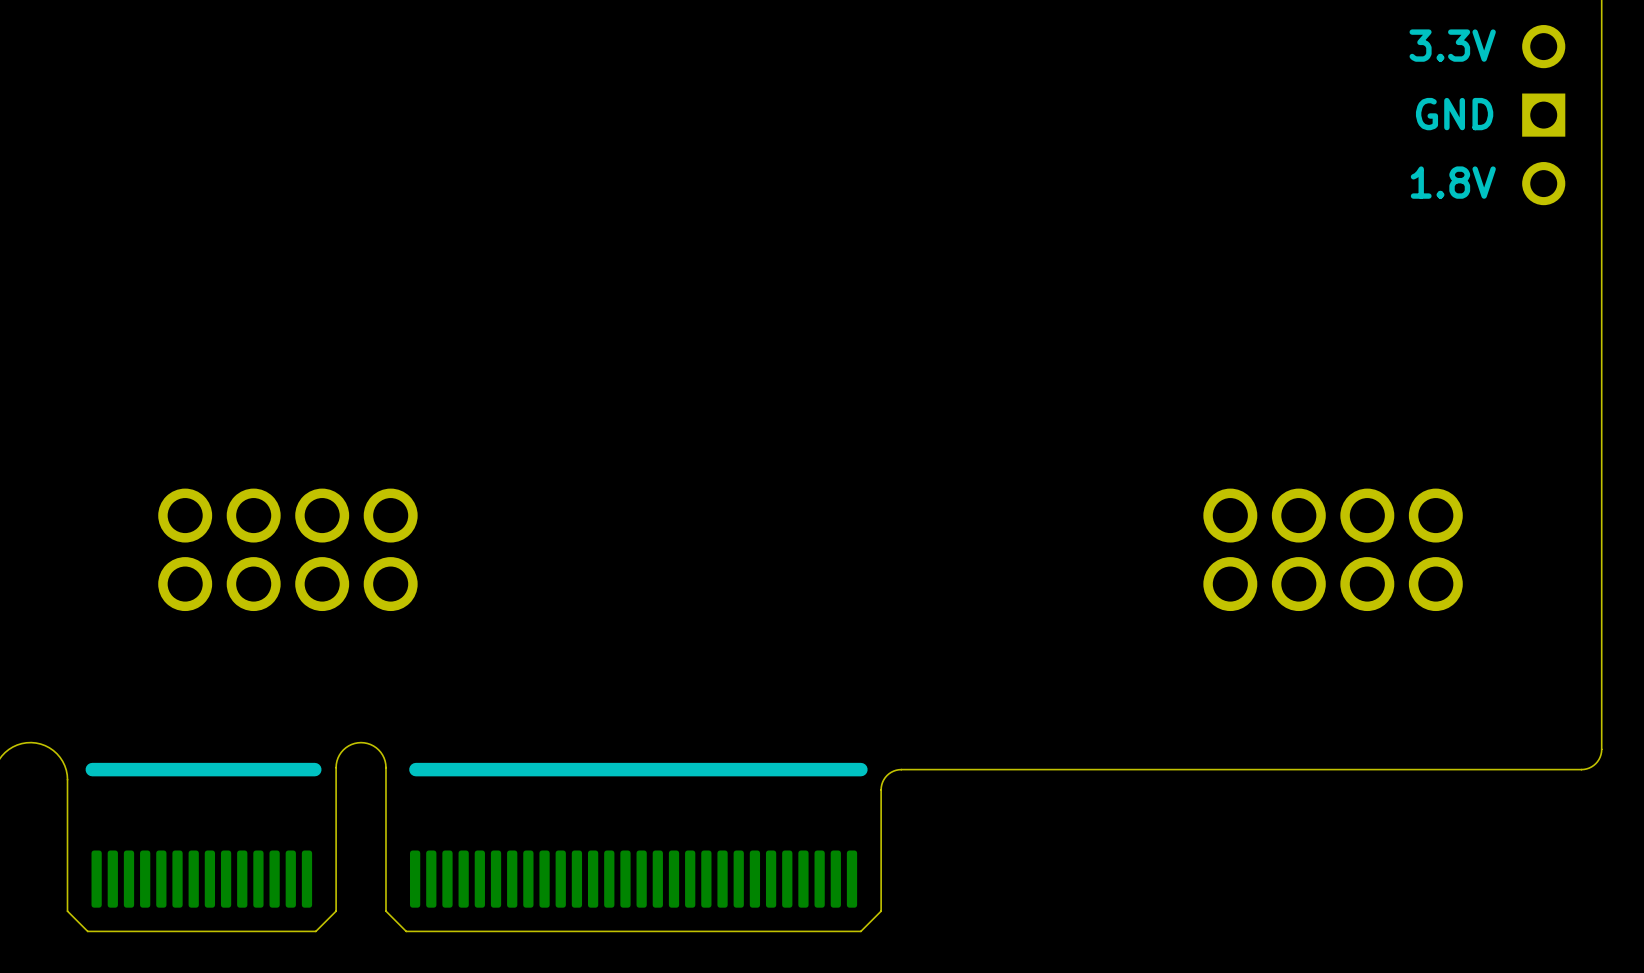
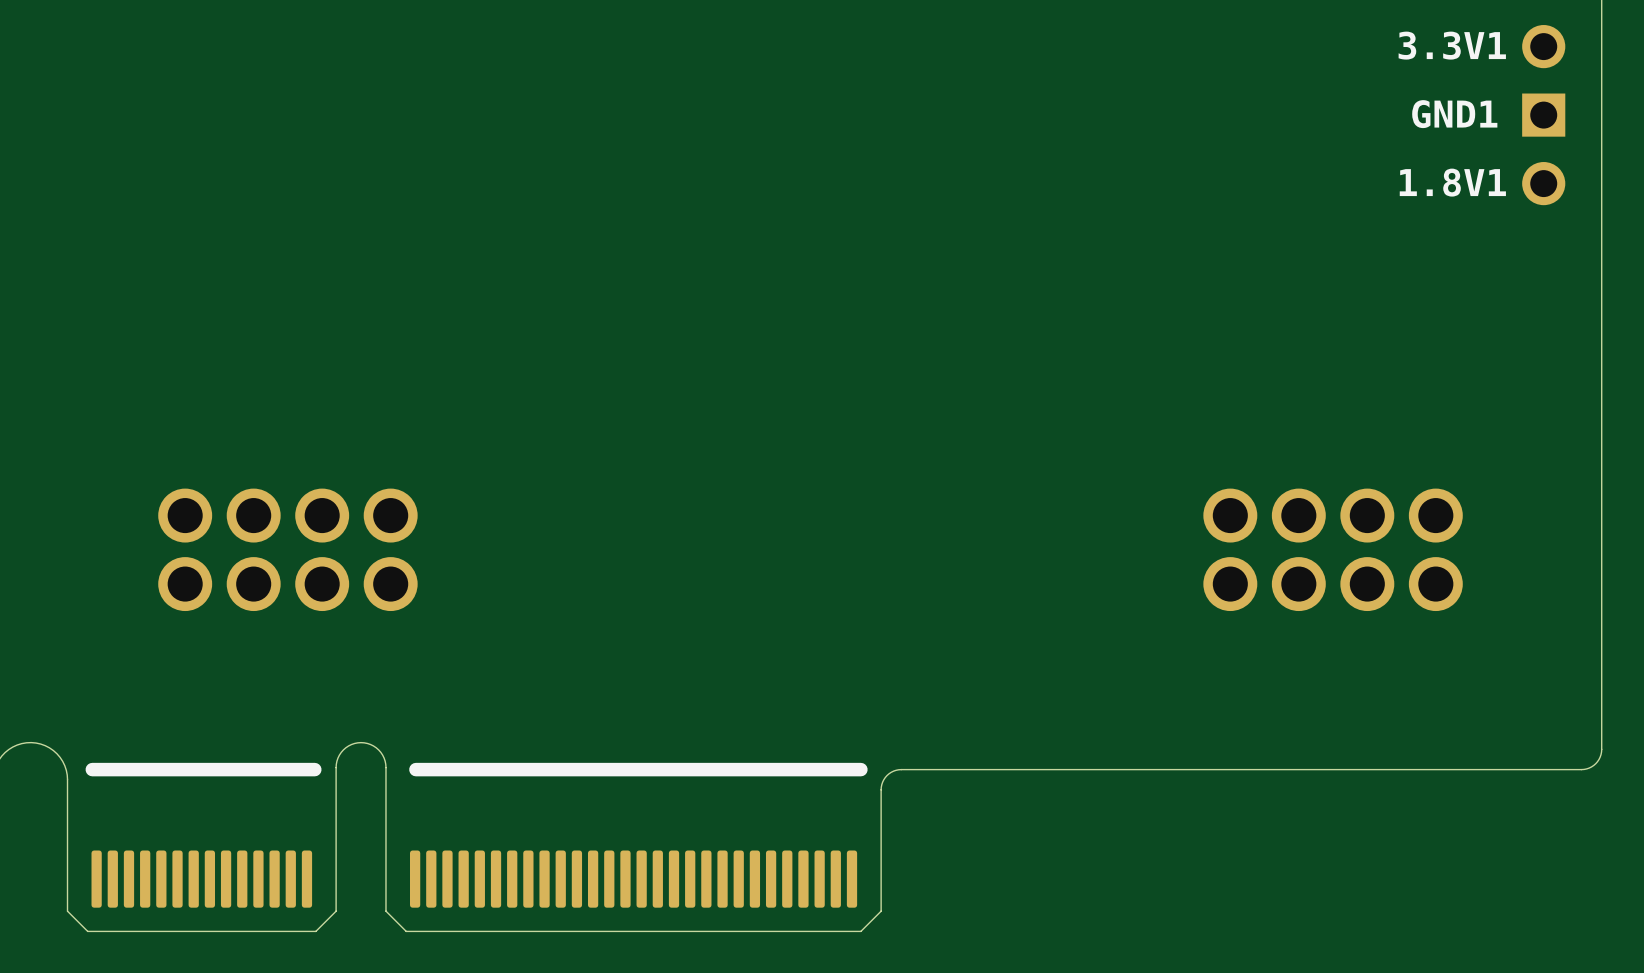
3.3V name: 3.3V (1452, 45) -> 3.3V1 (1452, 45)
GND name: GND (1454, 114) -> GND1 (1454, 114)
1.8V name: 1.8V (1453, 182) -> 1.8V1 (1452, 182)

